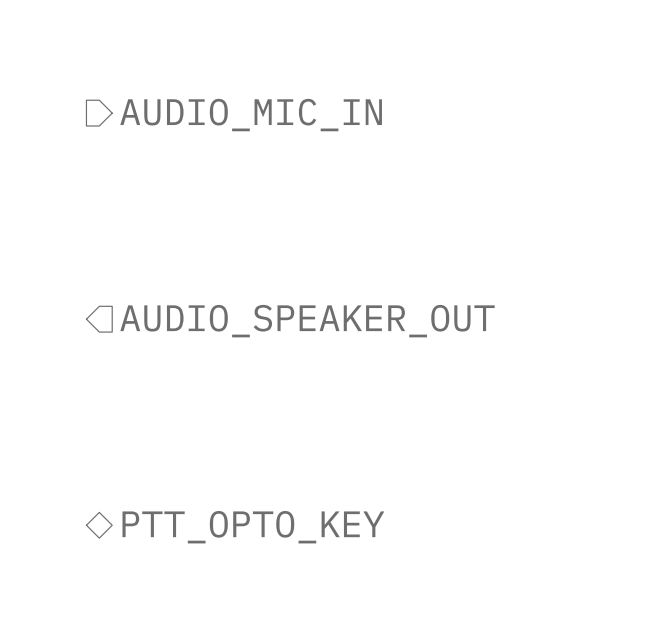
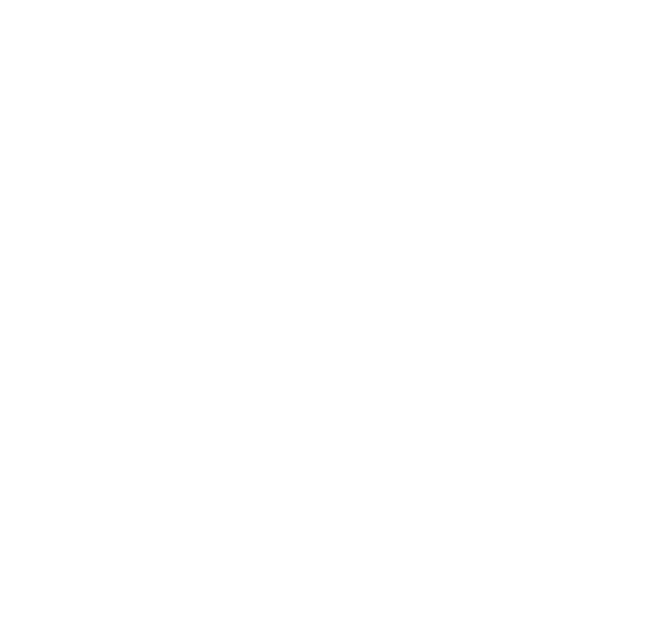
hierarchical label: AUDIO_MIC_IN (251, 115) -> none
hierarchical label: AUDIO_SPEAKER_OUT (307, 321) -> none
hierarchical label: PTT_OPTO_KEY (253, 527) -> none

